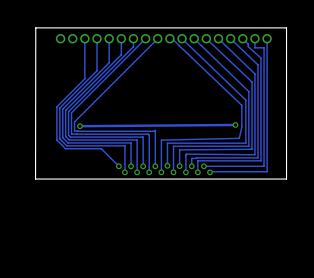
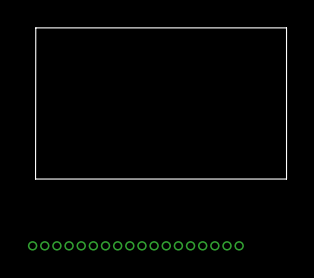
track: (84, 38) (84, 78) (56, 106) (56, 140) (65, 148) (101, 148) (118, 166) -> none
track: (97, 38) (97, 70) (59, 107) (59, 138) (66, 145) (124, 145) (124, 172) -> none
track: (109, 38) (109, 62) (62, 109) (62, 137) (67, 142) (131, 142) (131, 166) -> none
track: (121, 38) (121, 54) (65, 110) (65, 136) (69, 140) (136, 140) (137, 172) -> none
track: (133, 38) (133, 46) (68, 111) (68, 135) (70, 137) (142, 137) -> none
track: (145, 38) (71, 112) (71, 134) (76, 134) -> none
track: (157, 38) (74, 121) (74, 131) (155, 130) (155, 166) -> none
part position: (163, 38) -> (135, 245)
track: (169, 38) (172, 38) (241, 105) (241, 127) (239, 138) (161, 140) (161, 172) -> none
track: (182, 38) (245, 100) (245, 143) (167, 143) (167, 165) -> none
track: (194, 38) (248, 91) (248, 146) (173, 146) (173, 172) -> none
track: (206, 38) (252, 81) (252, 149) (179, 149) (179, 166) -> none
track: (218, 38) (254, 73) (254, 154) (186, 154) (185, 172) -> none
track: (230, 38) (257, 64) (257, 157) (191, 158) (191, 166) -> none
track: (242, 38) (261, 58) (261, 160) (197, 160) (197, 172) -> none
track: (254, 38) (254, 47) (264, 47) (264, 166) (203, 166) -> none
track: (267, 38) (267, 171) (209, 172) -> none
track: (235, 124) (80, 126) -> none
via: (235, 124) -> none
via: (80, 126) -> none
track: (76, 134) (149, 134) (149, 172) -> none
track: (142, 137) (143, 166) -> none
via: (167, 165) -> none
via: (118, 166) -> none
via: (131, 166) -> none
via: (143, 166) -> none
via: (155, 166) -> none
via: (179, 166) -> none
via: (191, 166) -> none
via: (203, 166) -> none
via: (124, 172) -> none
via: (137, 172) -> none
via: (149, 172) -> none
via: (161, 172) -> none
via: (173, 172) -> none
via: (185, 172) -> none
via: (197, 172) -> none
via: (209, 172) -> none

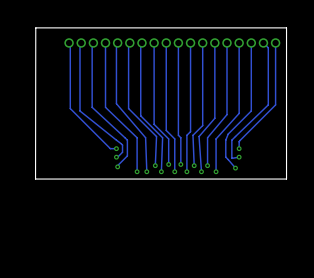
track: none -> (69, 42) (70, 108) (110, 148) (116, 148)
track: none -> (81, 42) (80, 111) (122, 145) (122, 152) (116, 157)
track: none -> (93, 42) (92, 107) (127, 140) (127, 155) (117, 166)
track: none -> (105, 42) (105, 107) (137, 137) (137, 171)
track: none -> (117, 42) (116, 103) (145, 137) (146, 171)
track: none -> (129, 42) (128, 108) (156, 136) (155, 165)
track: none -> (141, 42) (140, 115) (162, 137) (161, 171)
track: none -> (154, 42) (154, 124) (168, 138) (168, 164)
track: none -> (166, 42) (166, 130) (174, 138) (174, 171)
track: none -> (178, 42) (178, 135) (180, 137) (180, 164)
track: none -> (190, 42) (190, 131) (186, 135) (186, 171)
track: none -> (202, 42) (202, 125) (192, 135) (194, 165)
track: none -> (214, 42) (214, 118) (199, 136) (201, 171)
track: none -> (226, 42) (226, 114) (207, 137) (207, 165)
track: none -> (239, 42) (239, 113) (216, 138) (216, 171)
track: none -> (251, 42) (251, 111) (228, 134) (225, 140) (225, 157) (235, 168)
track: none -> (263, 42) (268, 47) (268, 104) (231, 140) (231, 158) (239, 157)
track: none -> (275, 42) (275, 104) (240, 140) (239, 148)
via: none -> (116, 148)
via: none -> (239, 148)
via: none -> (116, 157)
via: none -> (239, 157)
via: none -> (168, 164)
via: none -> (180, 164)
via: none -> (155, 165)
via: none -> (194, 165)
via: none -> (207, 165)
via: none -> (117, 166)
via: none -> (235, 168)
via: none -> (137, 171)
via: none -> (146, 171)
via: none -> (161, 171)
via: none -> (174, 171)
via: none -> (186, 171)
via: none -> (201, 171)
via: none -> (216, 171)
part position: (135, 245) -> (172, 42)

